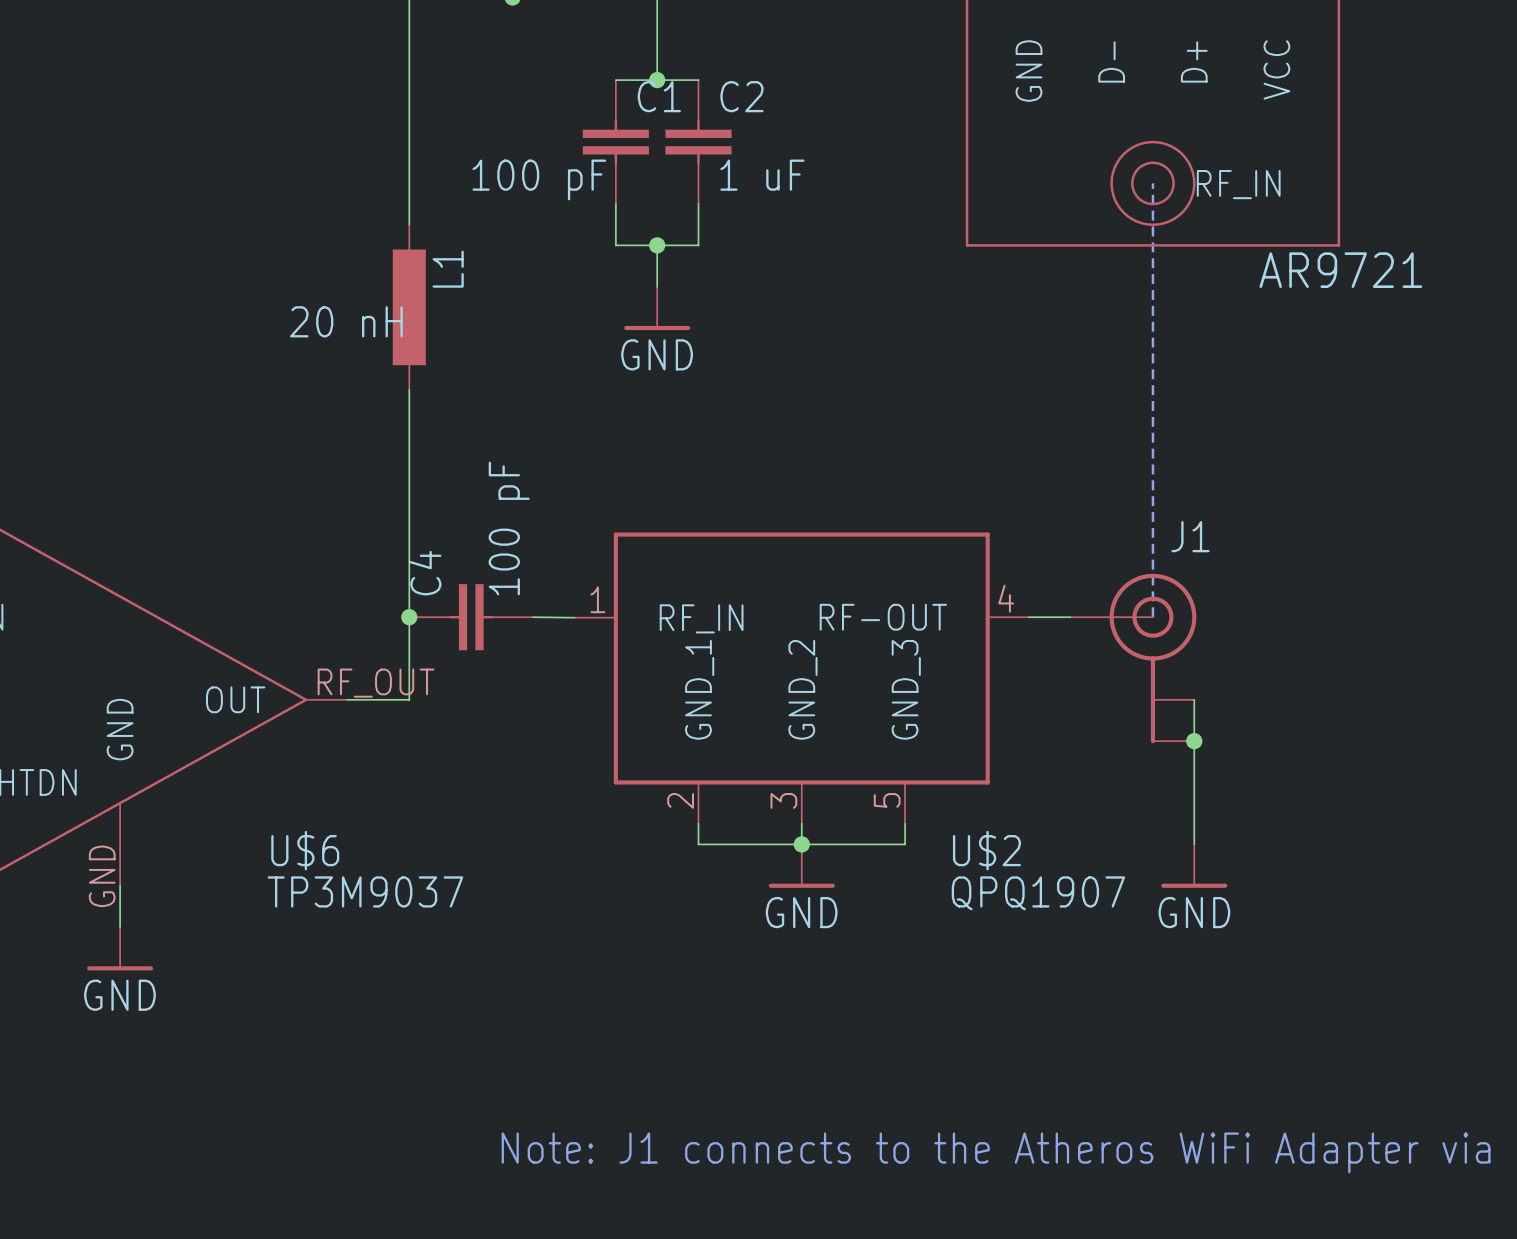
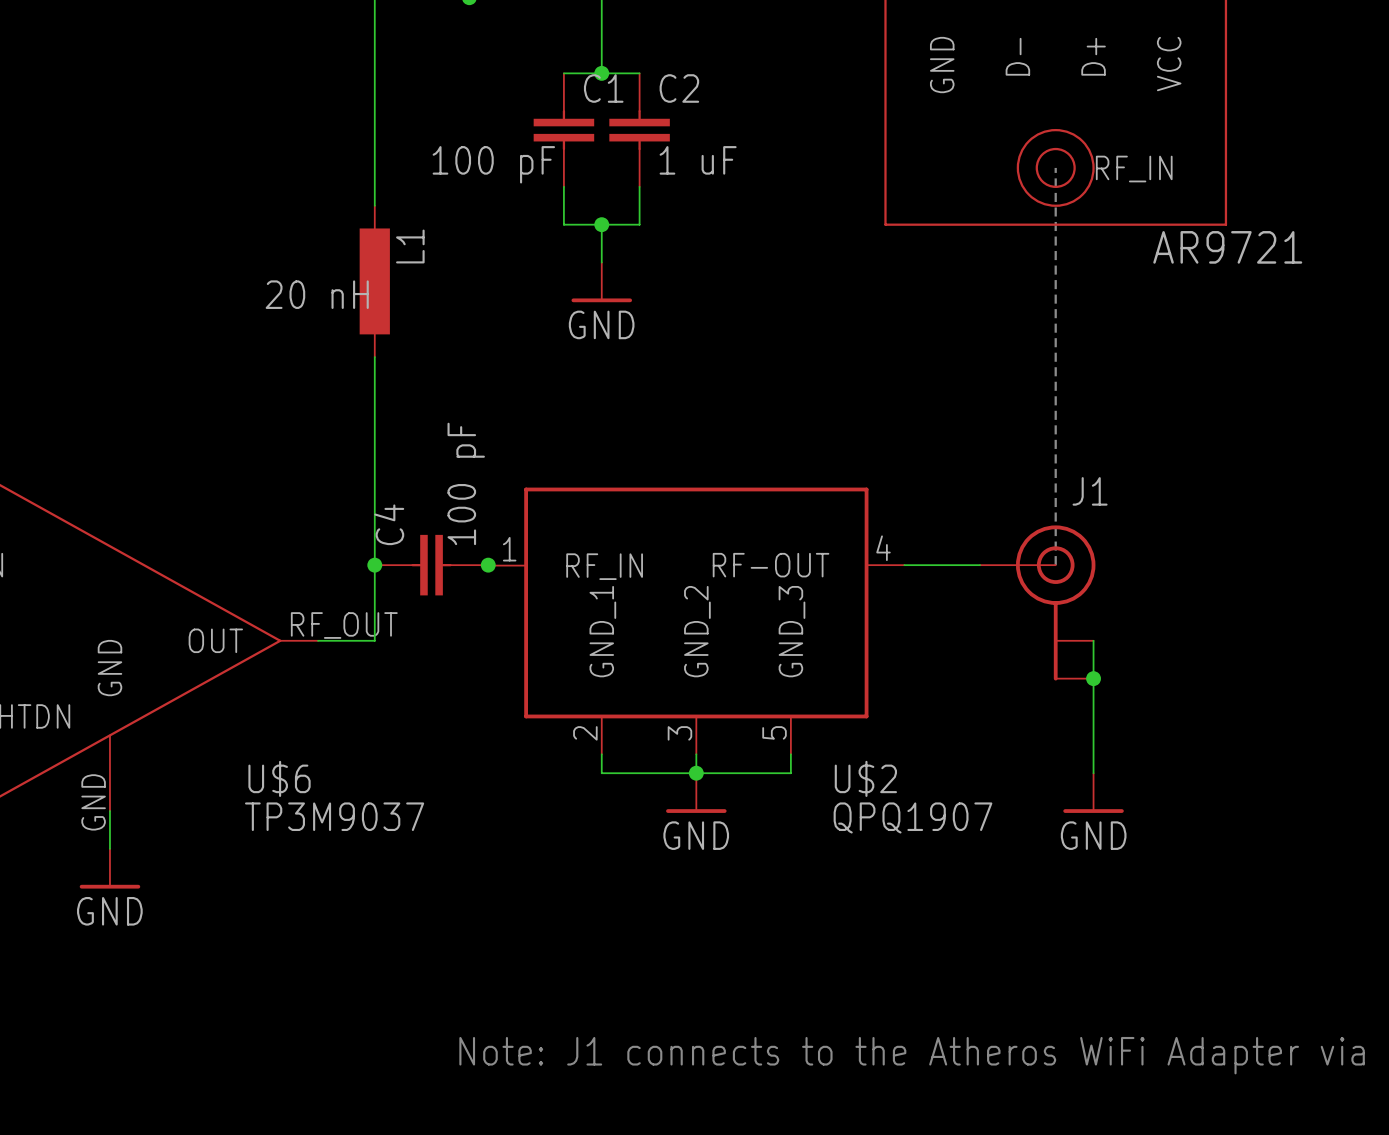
junction: none -> (488, 565)
U$2 position: (801, 678) -> (696, 620)
wire: (698, 823) (698, 844) -> (601, 754) (601, 773) (639, 773)
wire: (801, 823) (801, 844) -> (696, 754) (696, 773)
wire: (905, 823) (905, 844) (863, 844) -> (790, 754) (790, 773)
junction position: (801, 844) -> (696, 773)
power symbol position: GND (801, 866) -> GND (696, 793)

